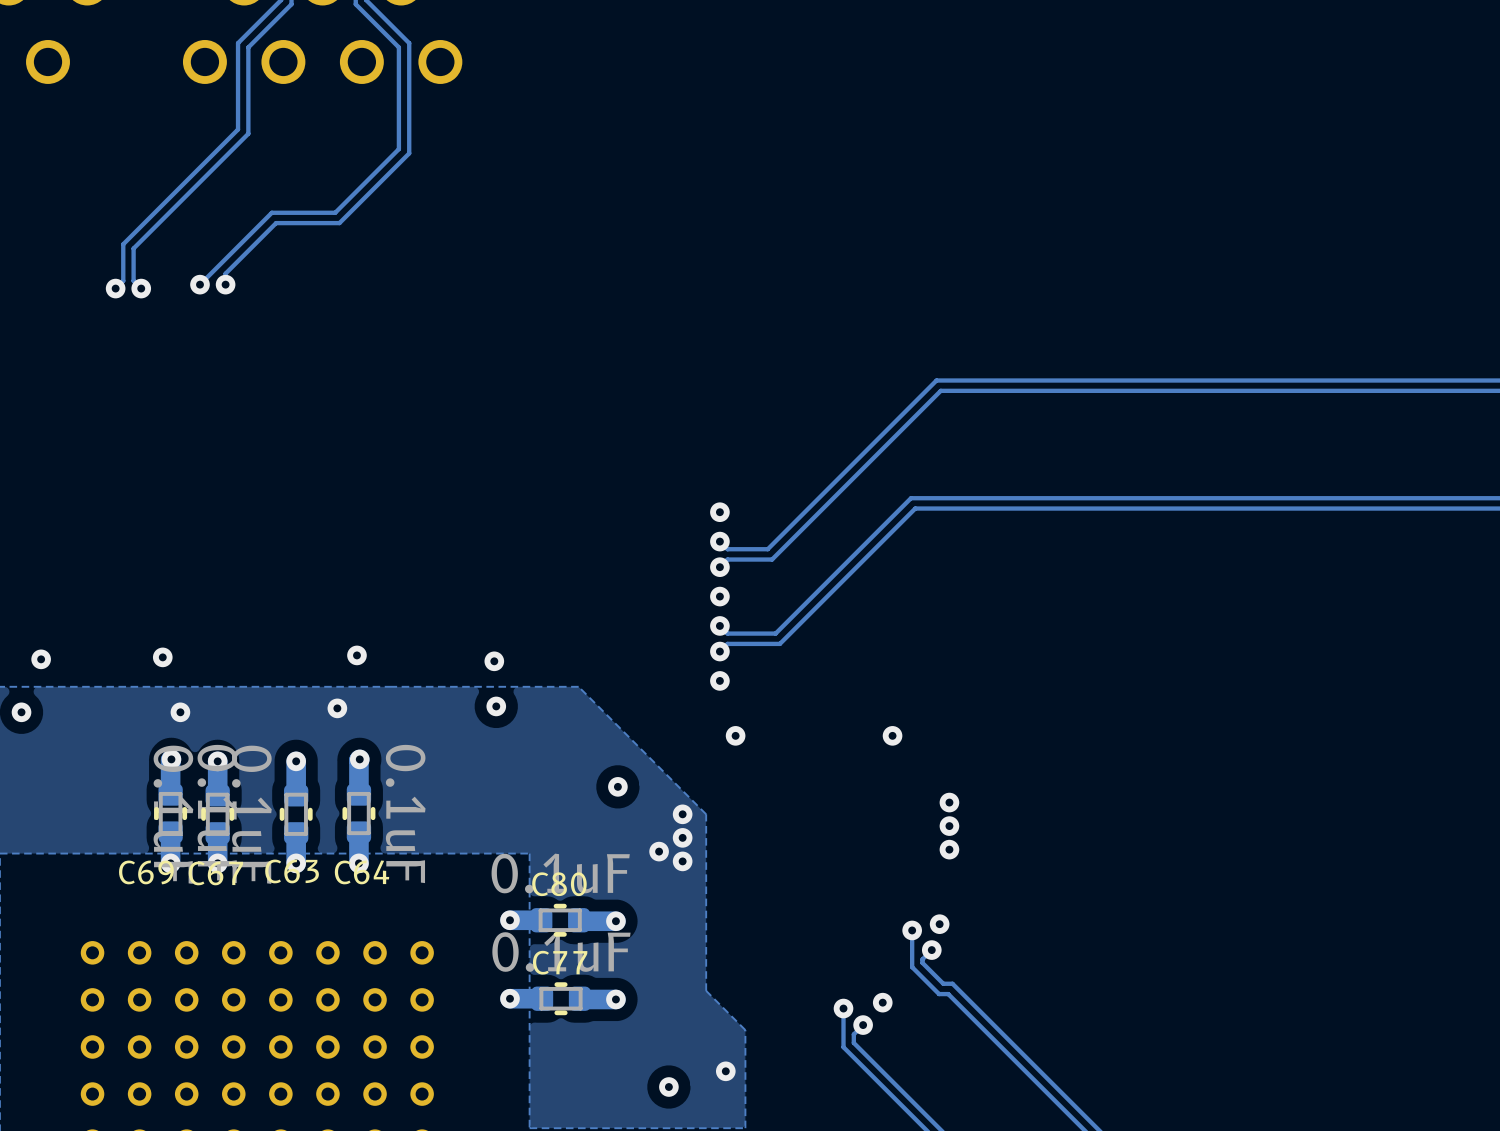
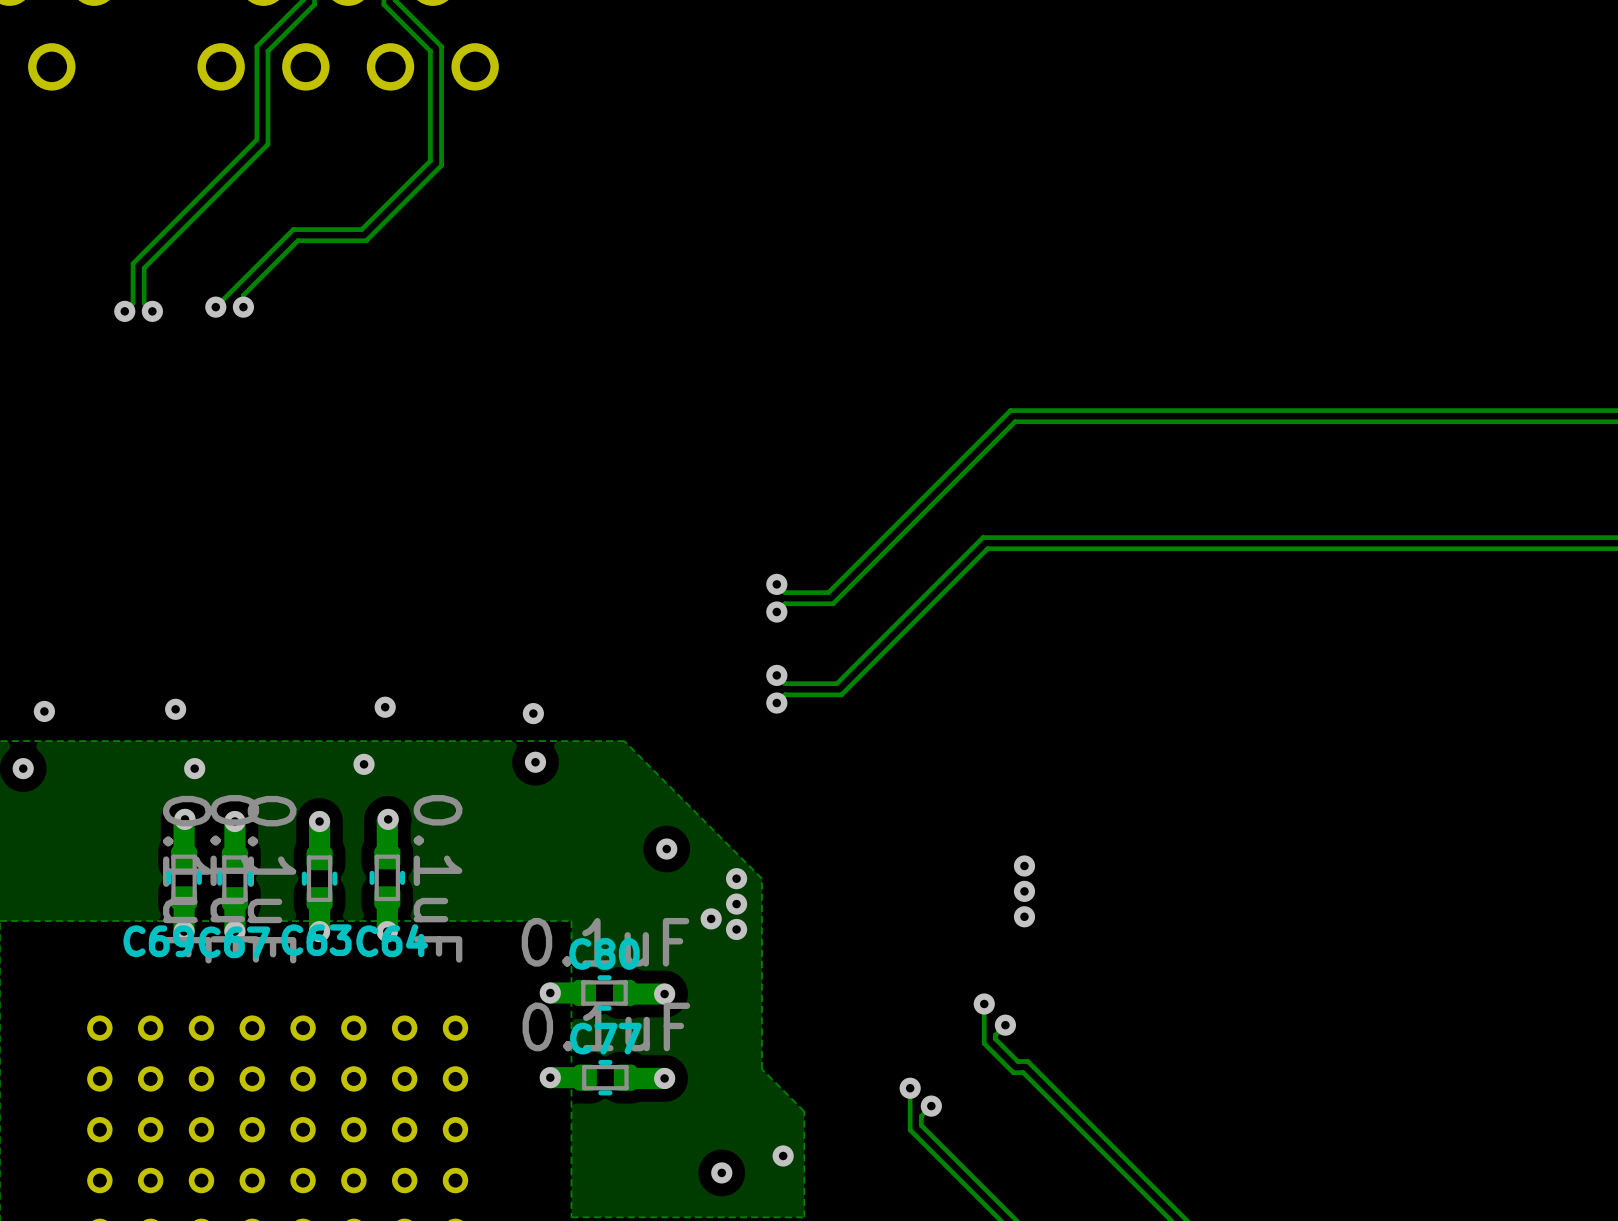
via: (719, 512) -> none
via: (719, 596) -> none
via: (719, 680) -> none
via: (735, 735) -> none
via: (892, 735) -> none
via: (939, 924) -> none
via: (882, 1002) -> none

